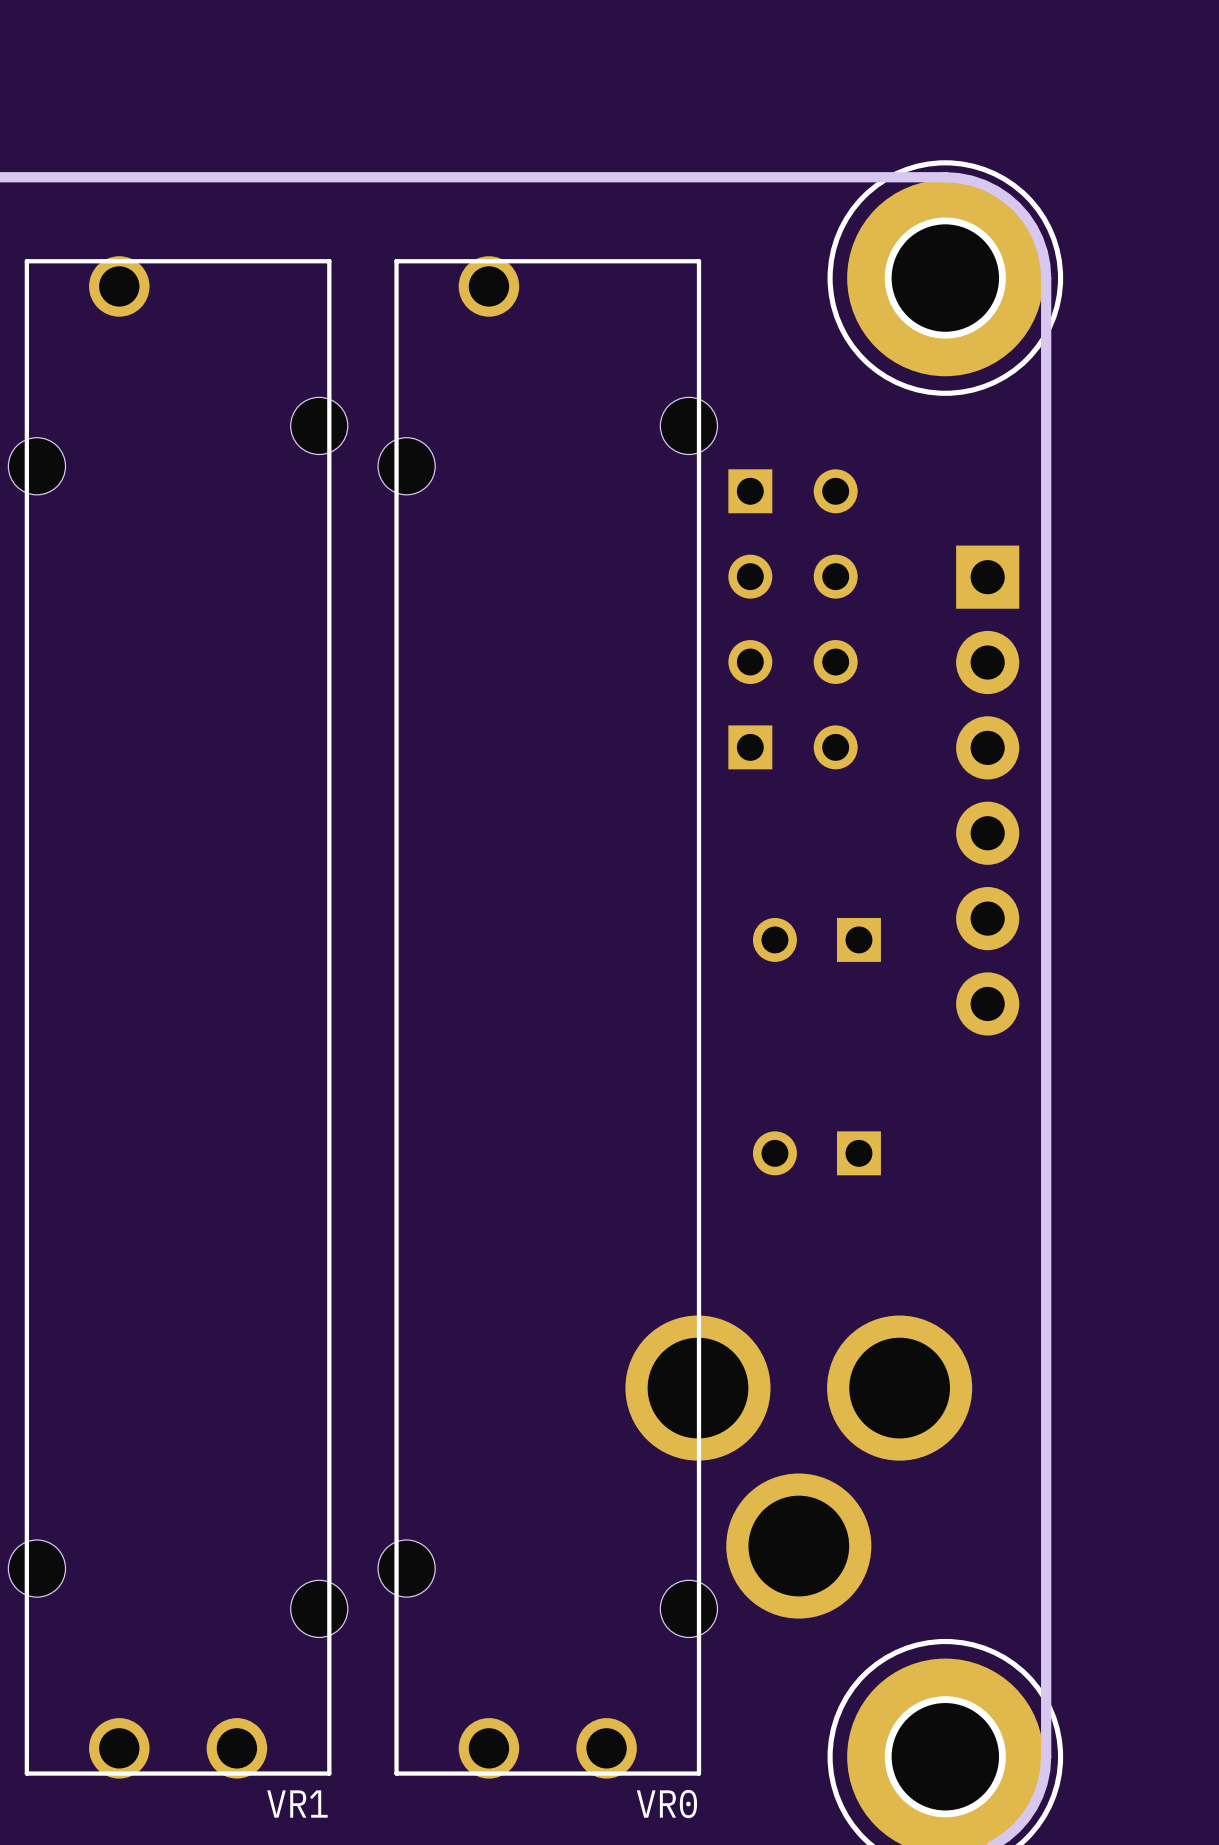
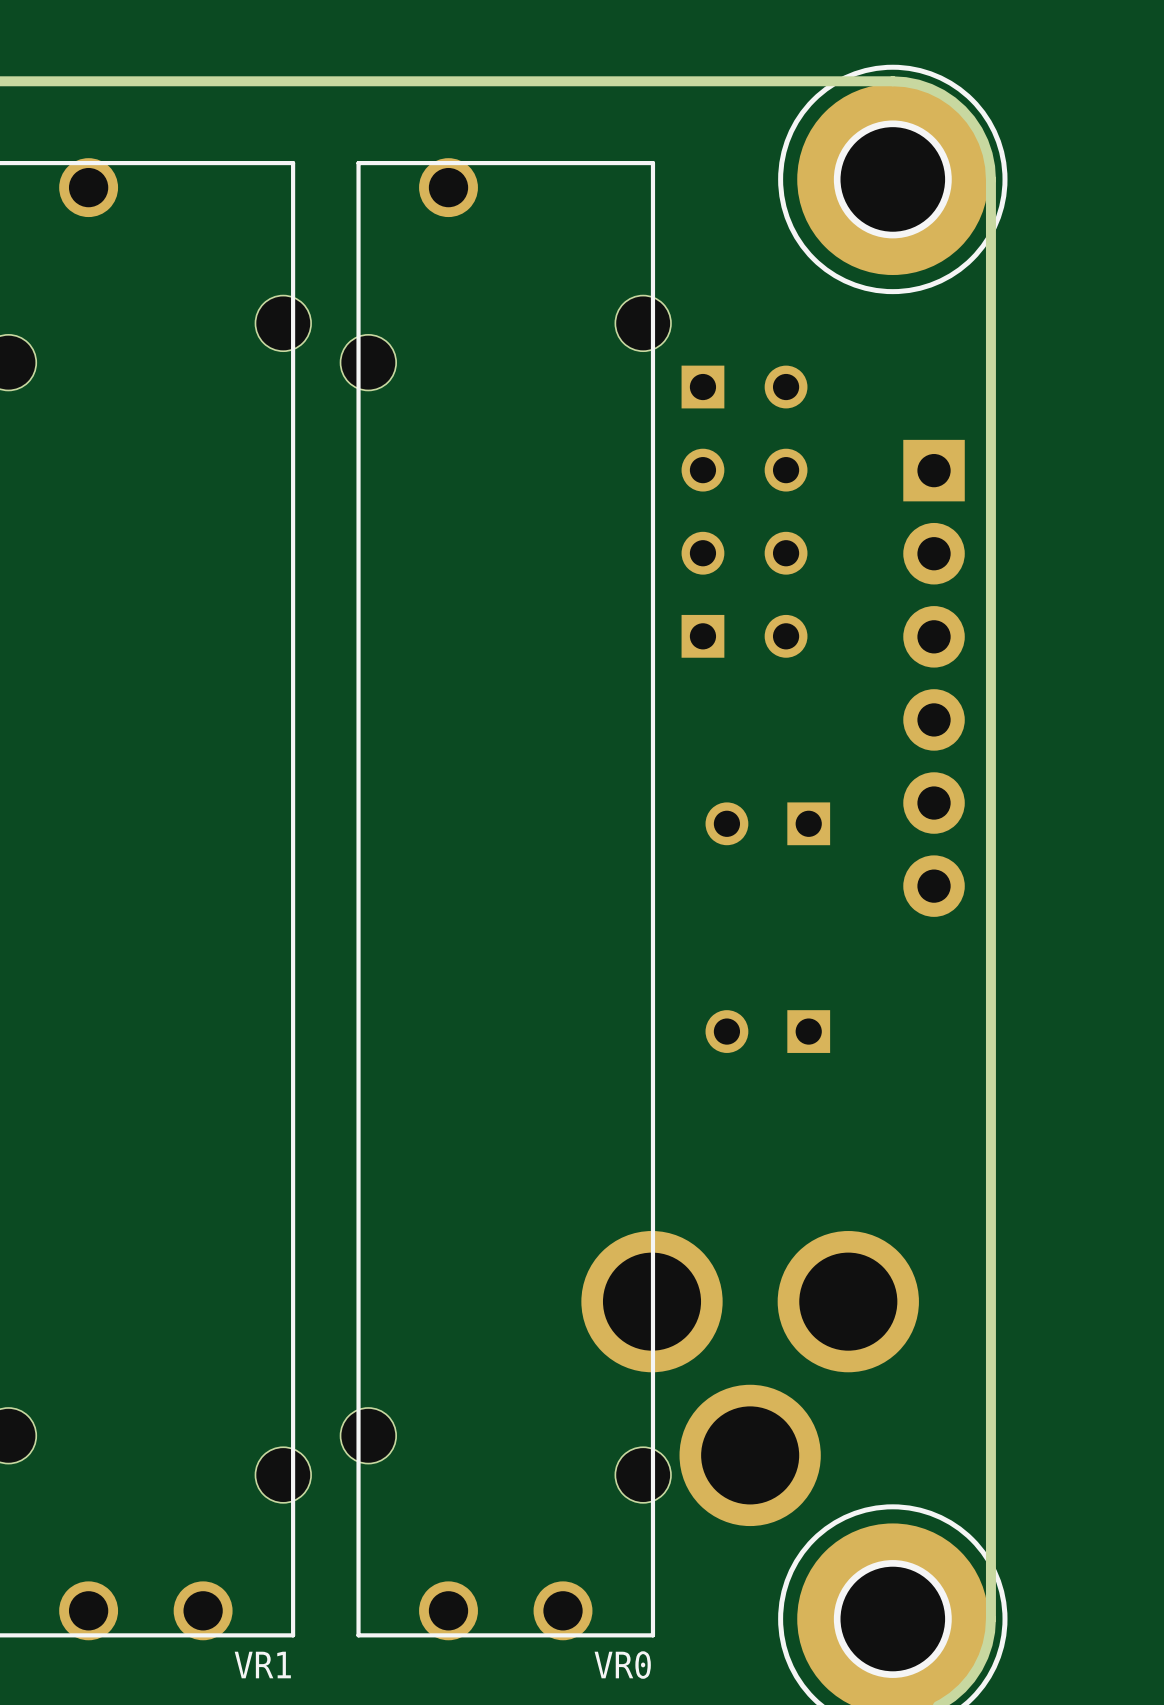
part position: (798, 1467) -> (750, 1378)

